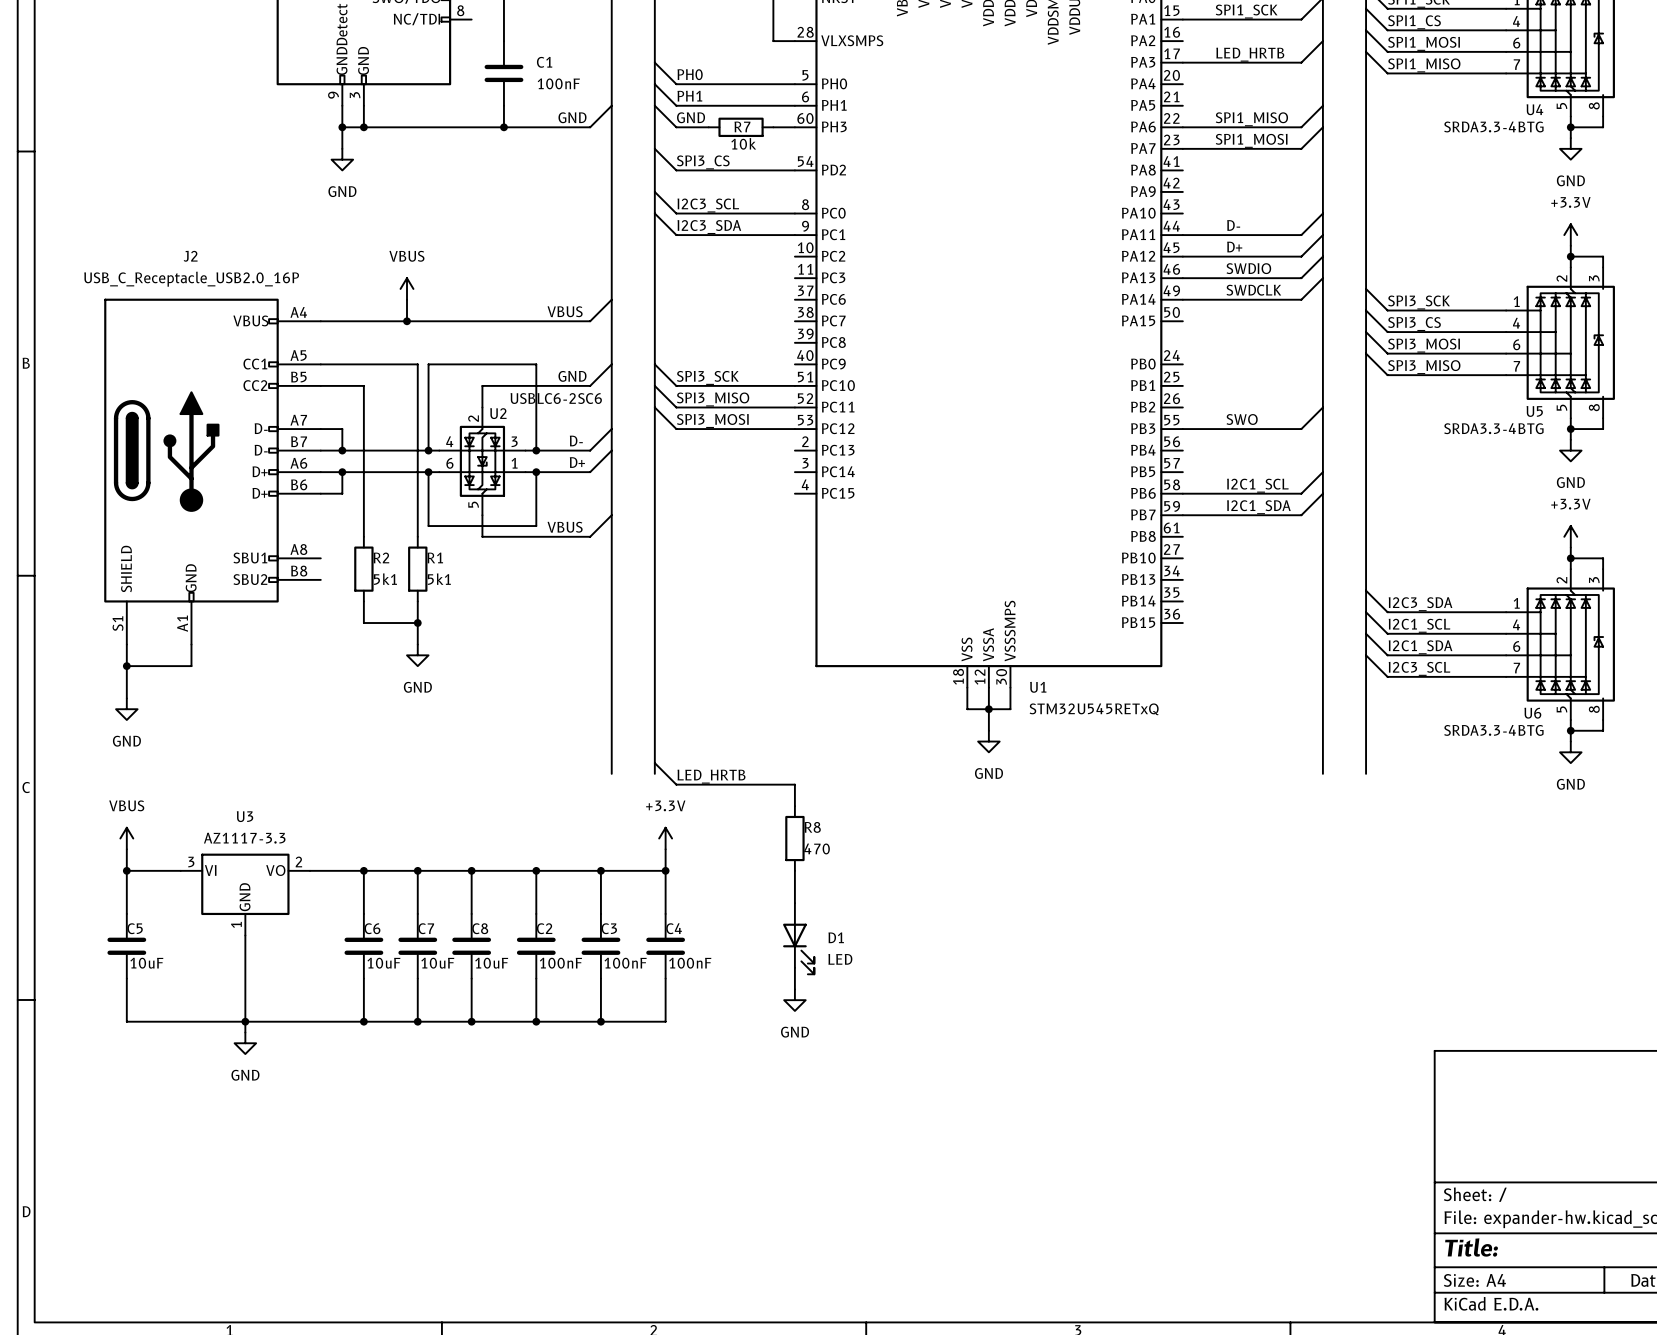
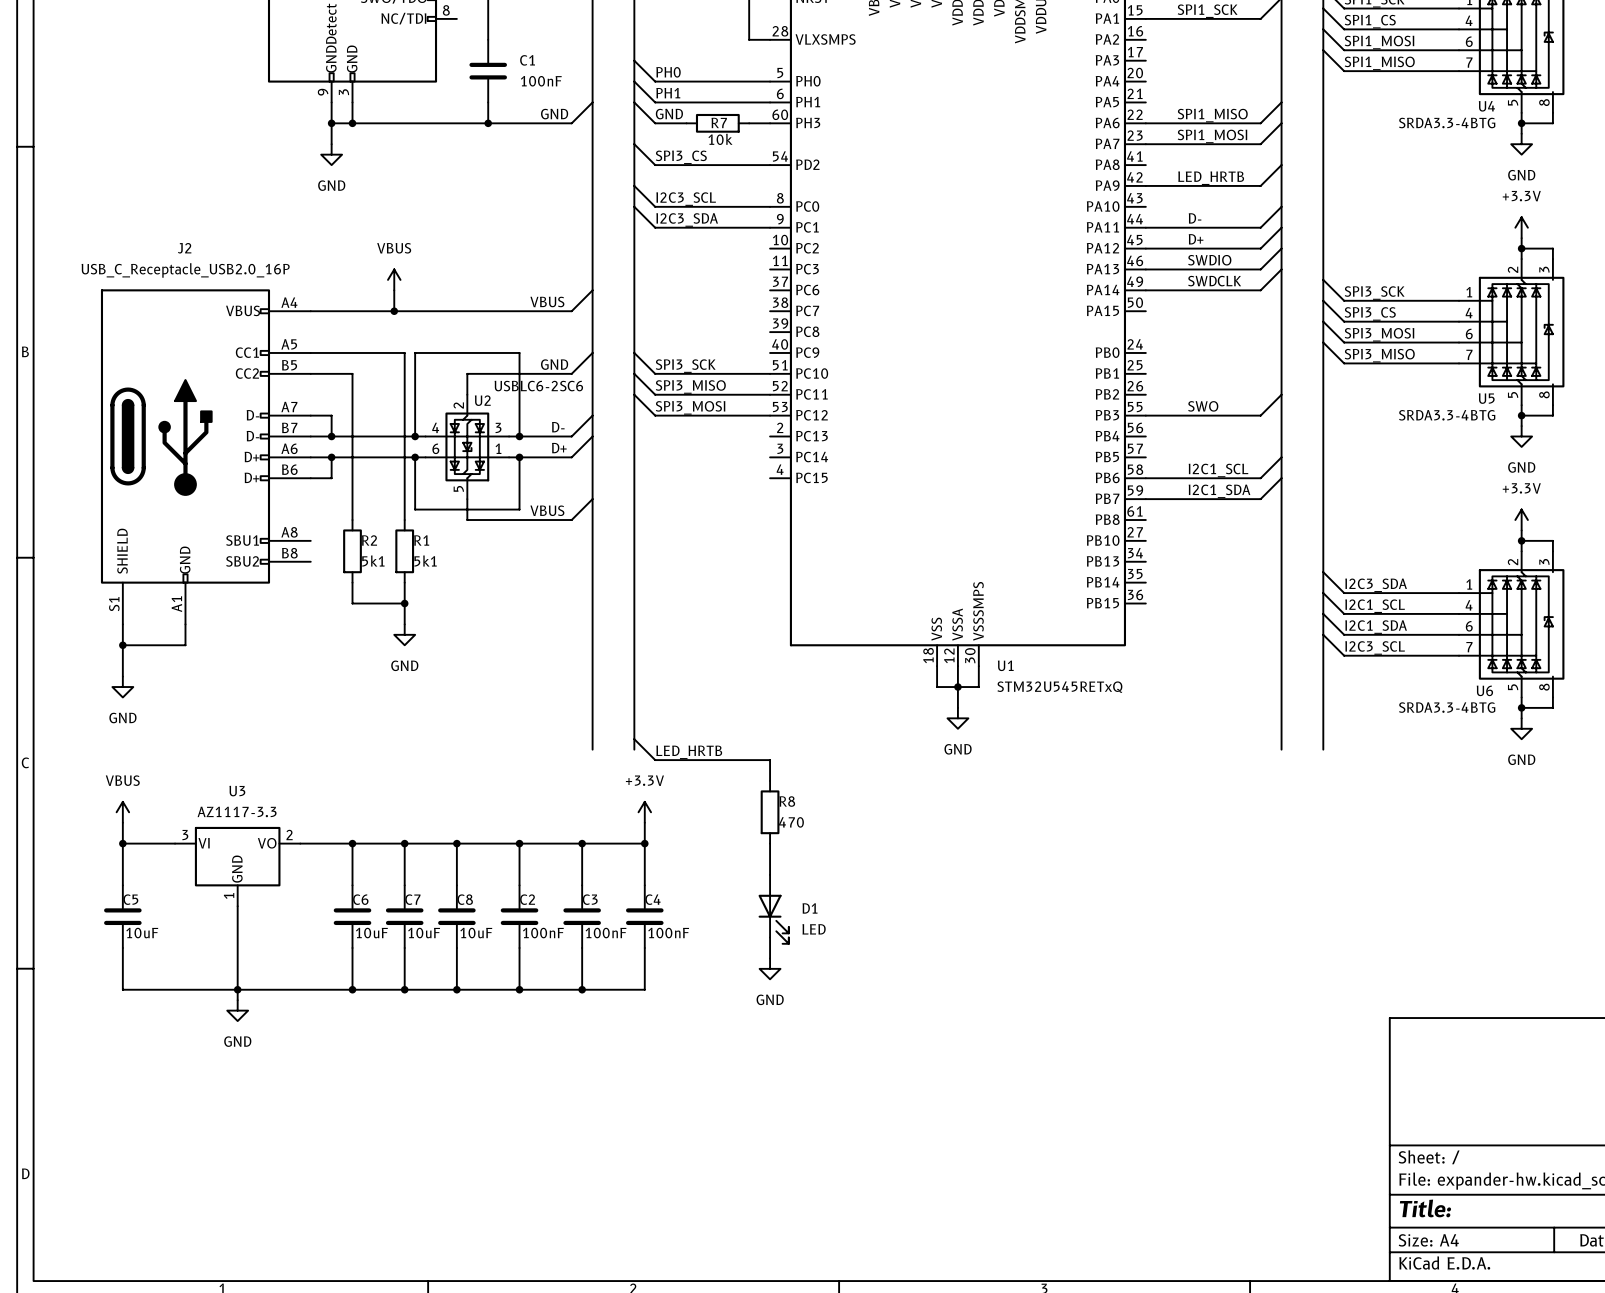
wire: (1322, 41) (1301, 62) (1182, 62) -> (1281, 165) (1260, 185) (1145, 185)
label position: LED_HRTB (1250, 54) -> LED_HRTB (1211, 178)

